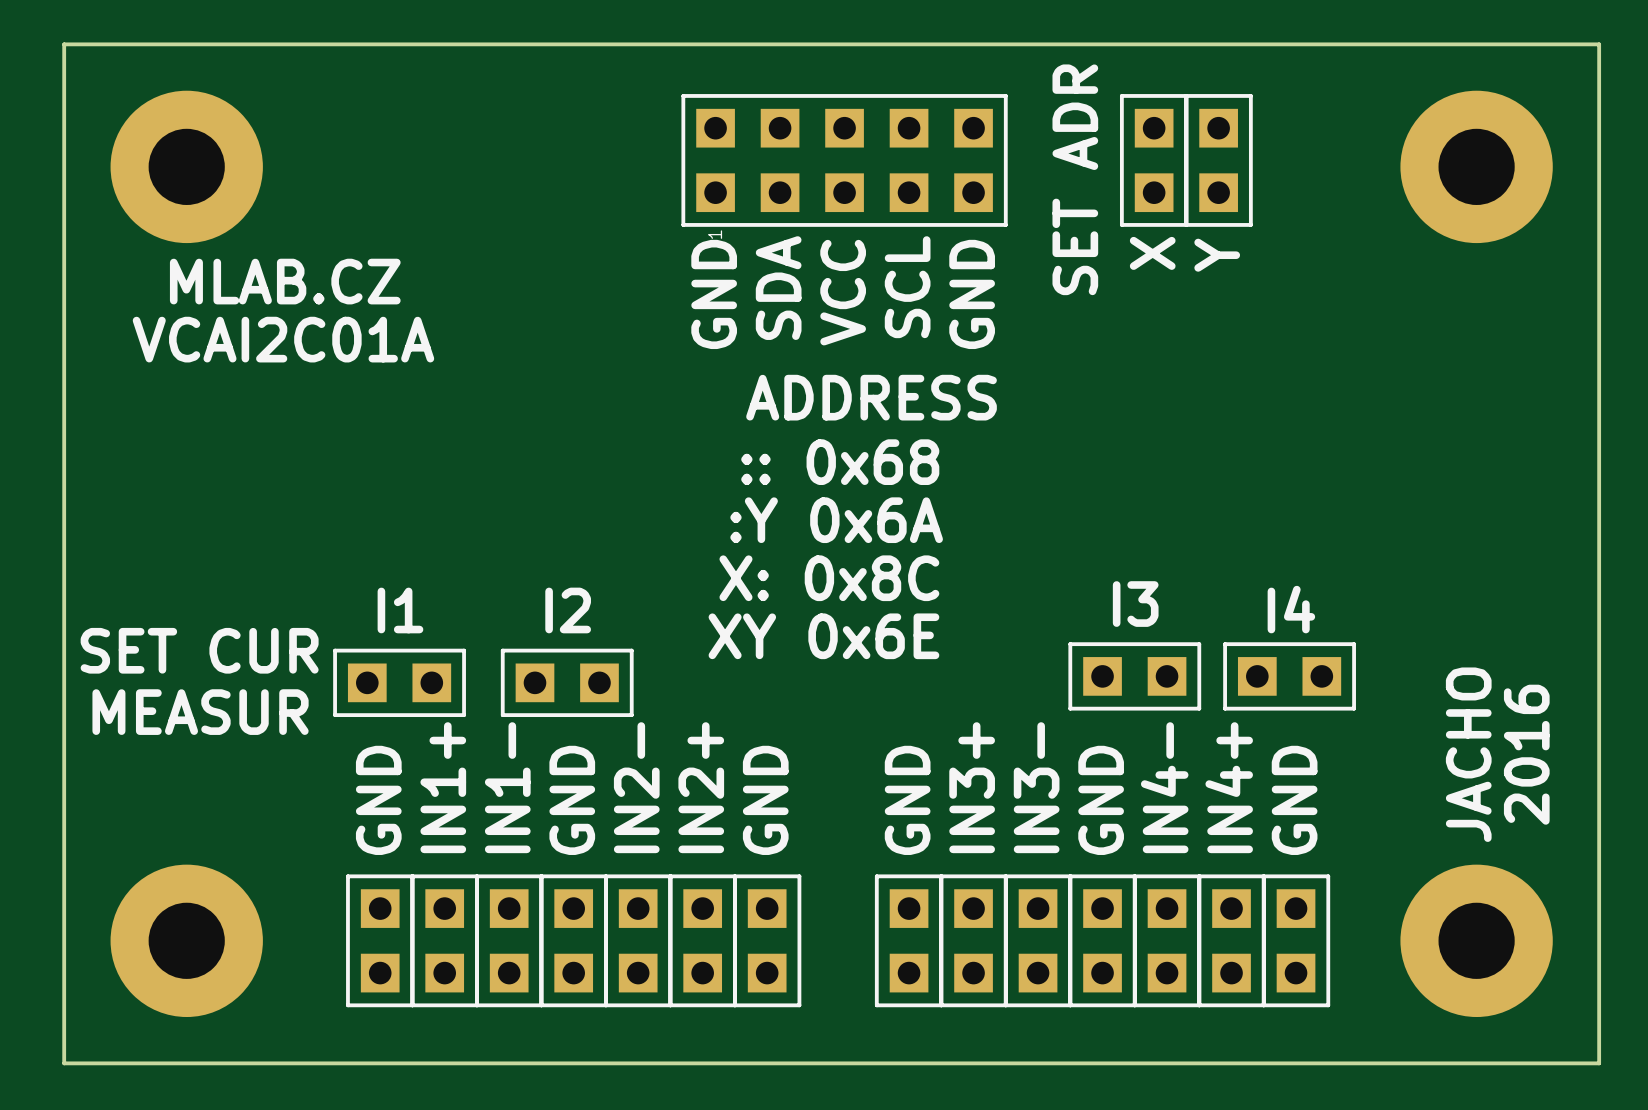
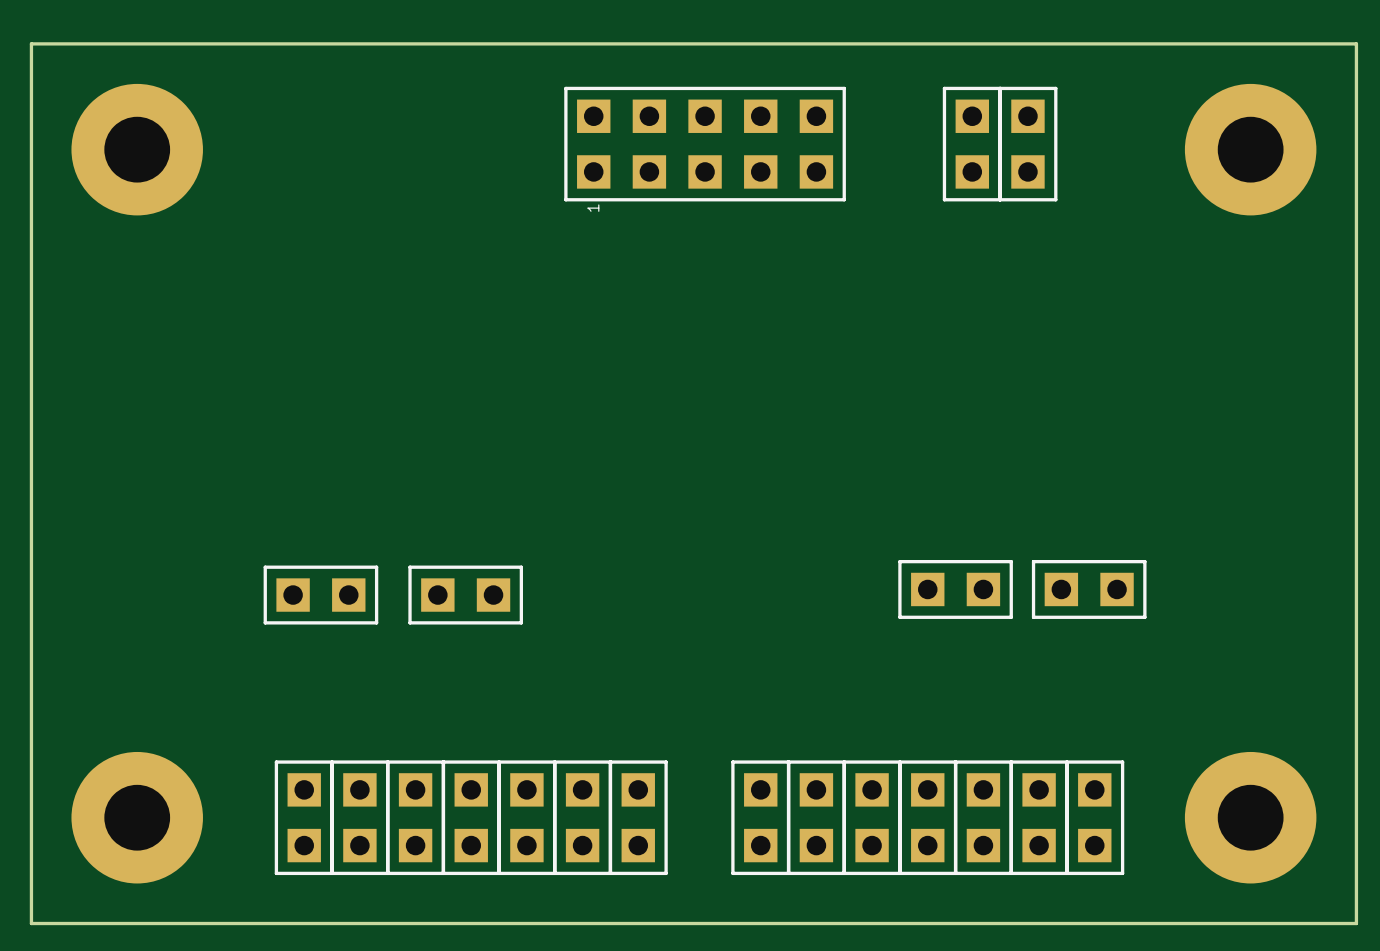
text: SET ADR (1075, 179) -> none
text: X (1152, 253) -> none
text: Y (1217, 255) -> none
text: MLAB.CZ (285, 281) -> none
text: SCL (907, 287) -> none
text: SDA (778, 288) -> none
text: VCC (843, 292) -> none
text: GND (714, 294) -> none
text: GND (972, 294) -> none
text: VCAI2C01A (283, 339) -> none
text: ADDRESS (871, 397) -> none
text: :: 0x68 (840, 462) -> none
text: :Y 0x6A (836, 520) -> none
text: X: 0x8C (829, 578) -> none
text: I3 (1135, 604) -> none
text: I4 (1291, 609) -> none
text: I1 (400, 610) -> none
text: I2 (568, 610) -> none
text: XY 0x6E (823, 636) -> none
text: SET CUR (199, 650) -> none
text: MEASUR (200, 712) -> none
text: JACHO (1468, 754) -> none
text: 2016 (1526, 754) -> none
text: IN1+ (443, 787) -> none
text: IN1- (507, 787) -> none
text: IN2- (636, 787) -> none
text: IN2+ (701, 787) -> none
text: IN3+ (972, 787) -> none
text: IN3- (1036, 787) -> none
text: IN4- (1164, 787) -> none
text: IN4+ (1229, 787) -> none
text: GND (378, 800) -> none
text: GND (572, 800) -> none
text: GND (765, 800) -> none
text: GND (907, 800) -> none
text: GND (1101, 800) -> none
text: GND (1294, 800) -> none

